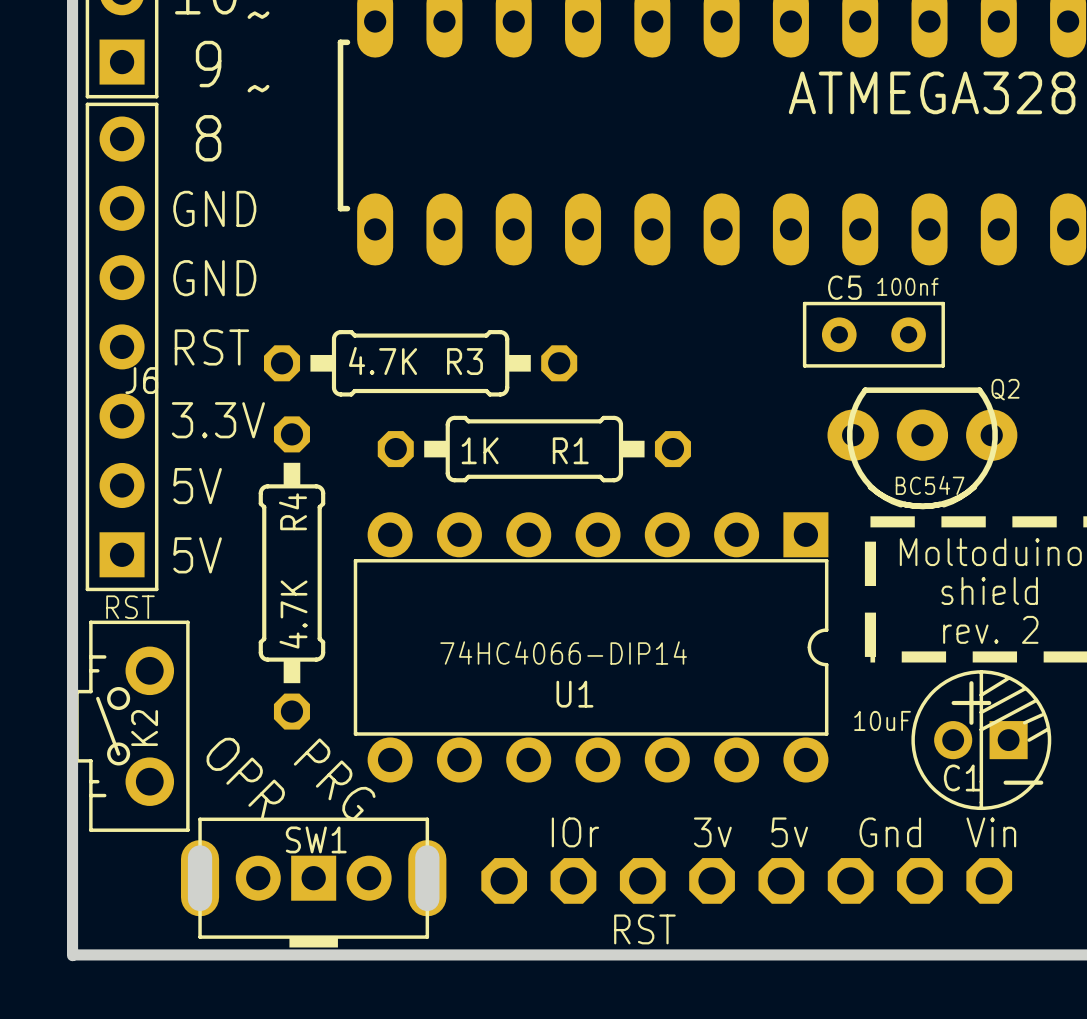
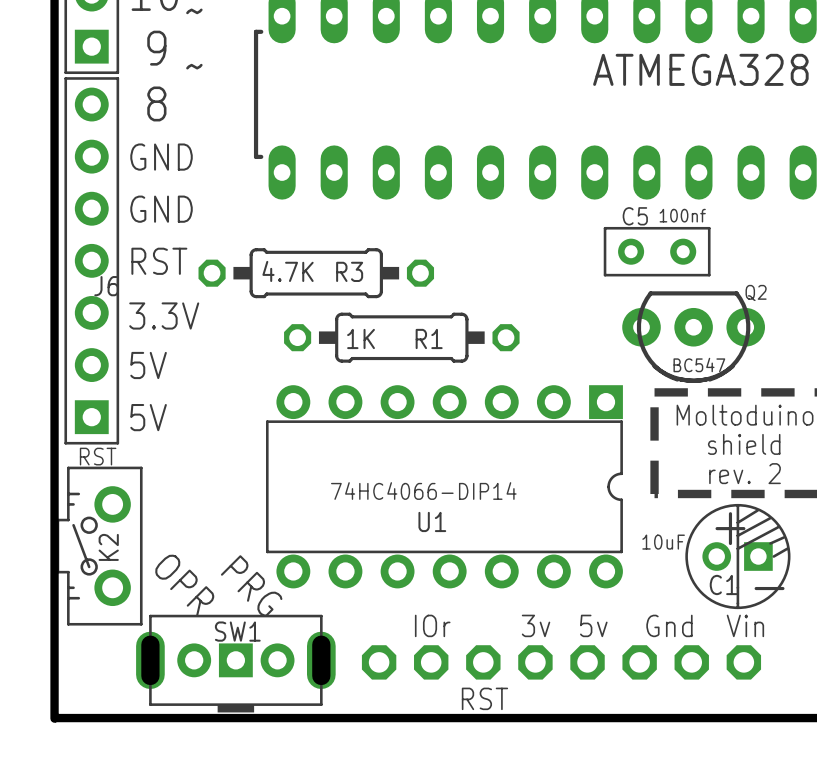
R4: 4.7K (291, 572) -> none

